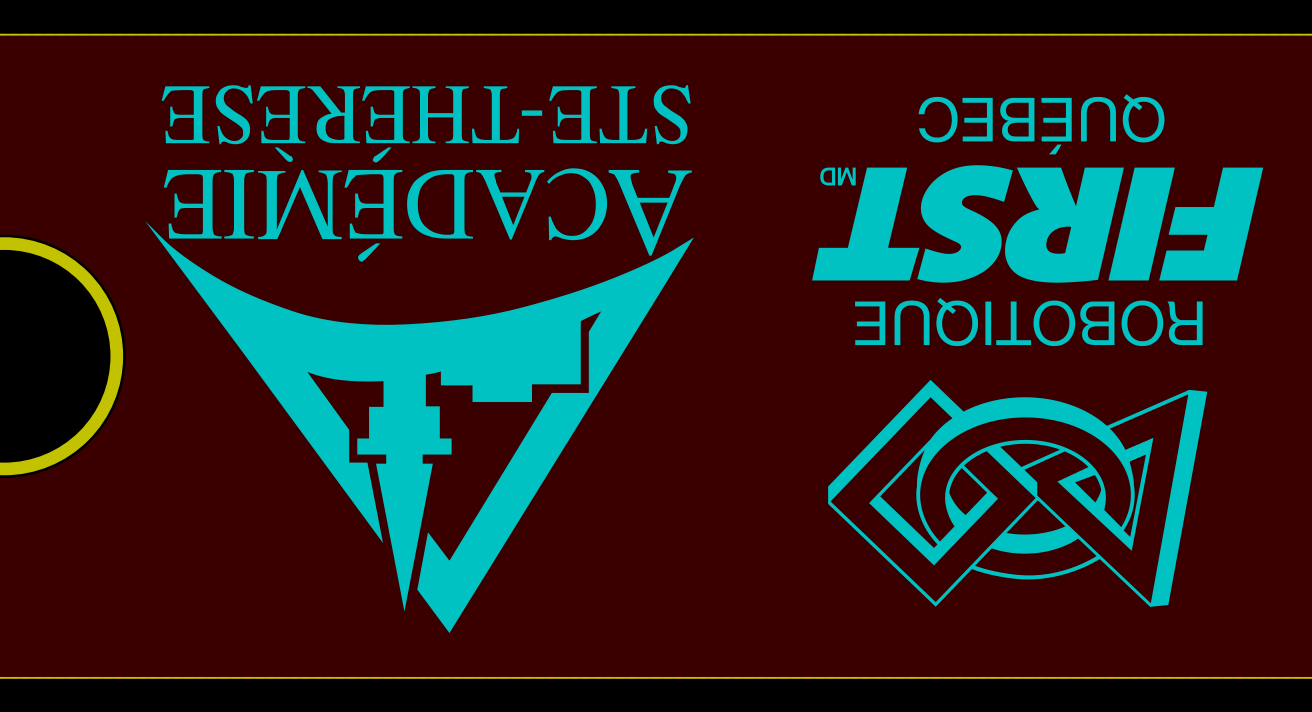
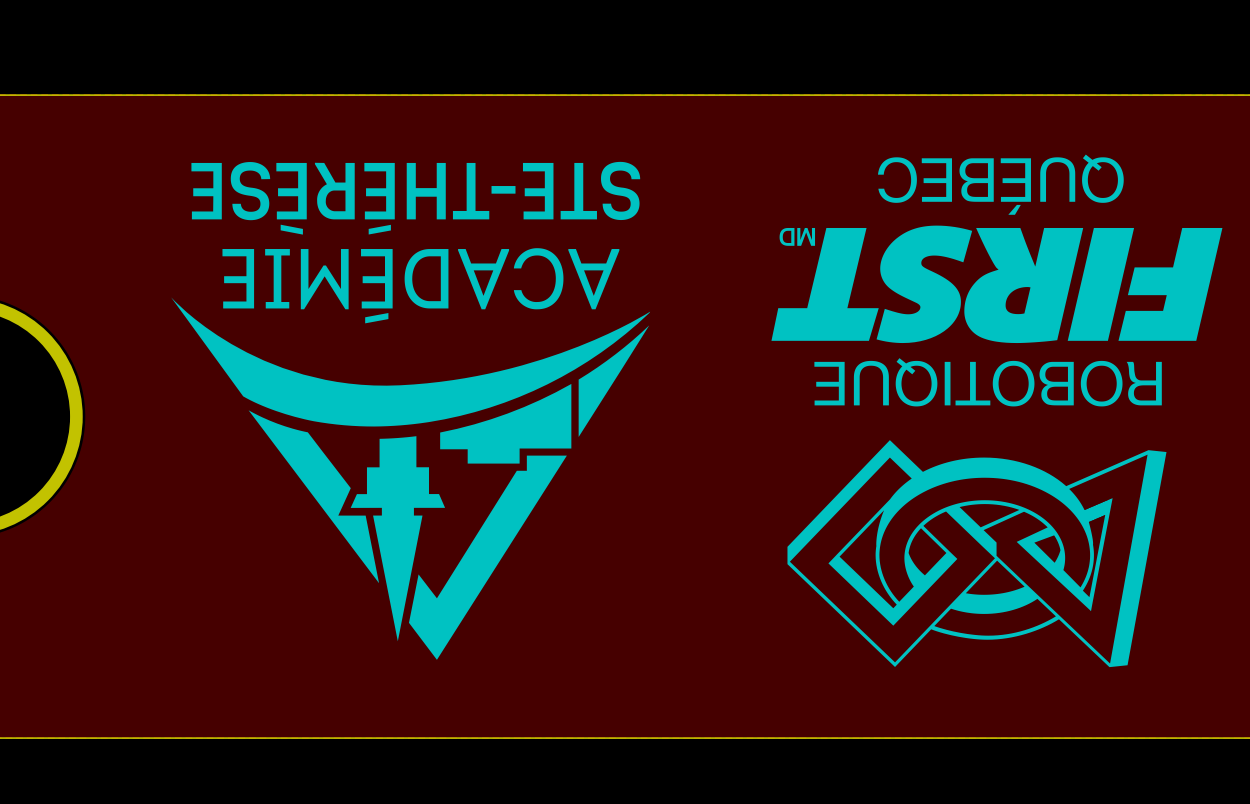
drawing: [145, 85, 694, 634] -> none
drawing shape: [653, 85, 691, 145] -> [600, 161, 641, 221]
drawing shape: [307, 86, 360, 144] -> [276, 162, 307, 220]
drawing shape: [599, 86, 648, 144] -> [560, 162, 597, 220]
drawing: none -> [171, 162, 651, 660]
drawing shape: [547, 168, 608, 241] -> [513, 248, 564, 310]
drawing shape: [344, 169, 403, 239] -> [300, 249, 349, 310]
drawing shape: [476, 169, 545, 240] -> [458, 249, 510, 310]
drawing shape: [608, 169, 692, 256] -> [568, 249, 620, 310]

